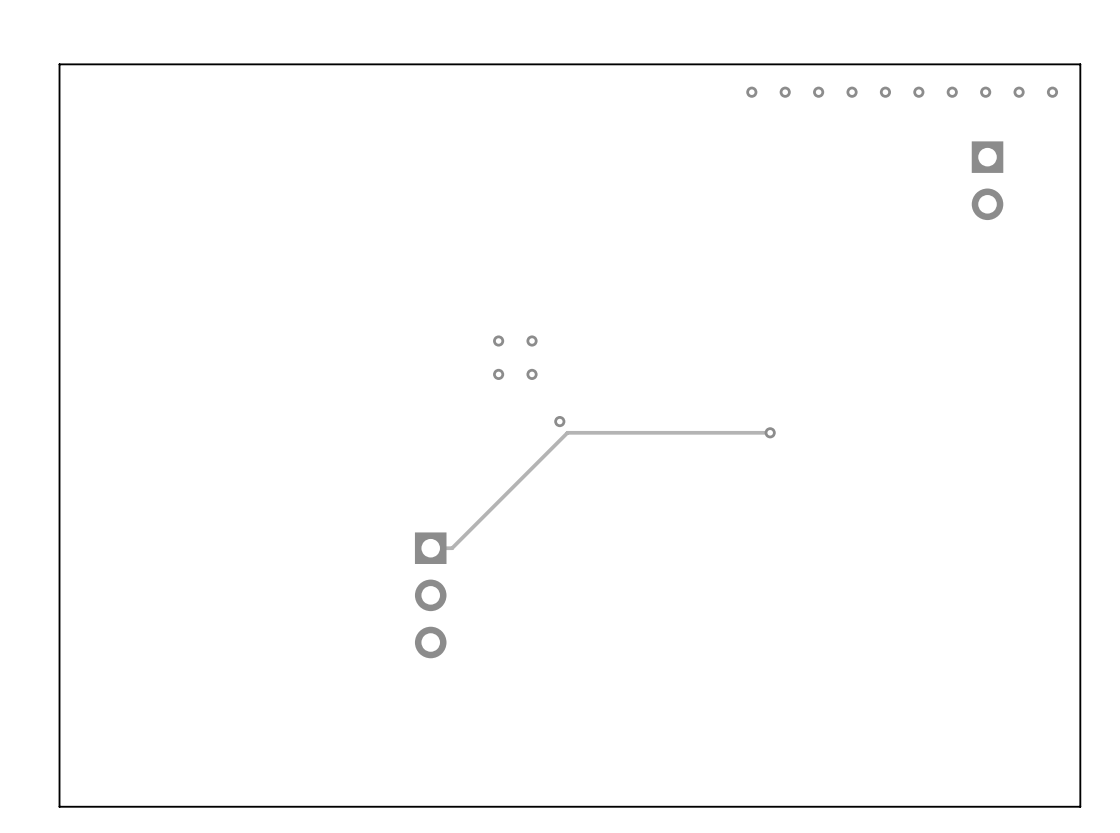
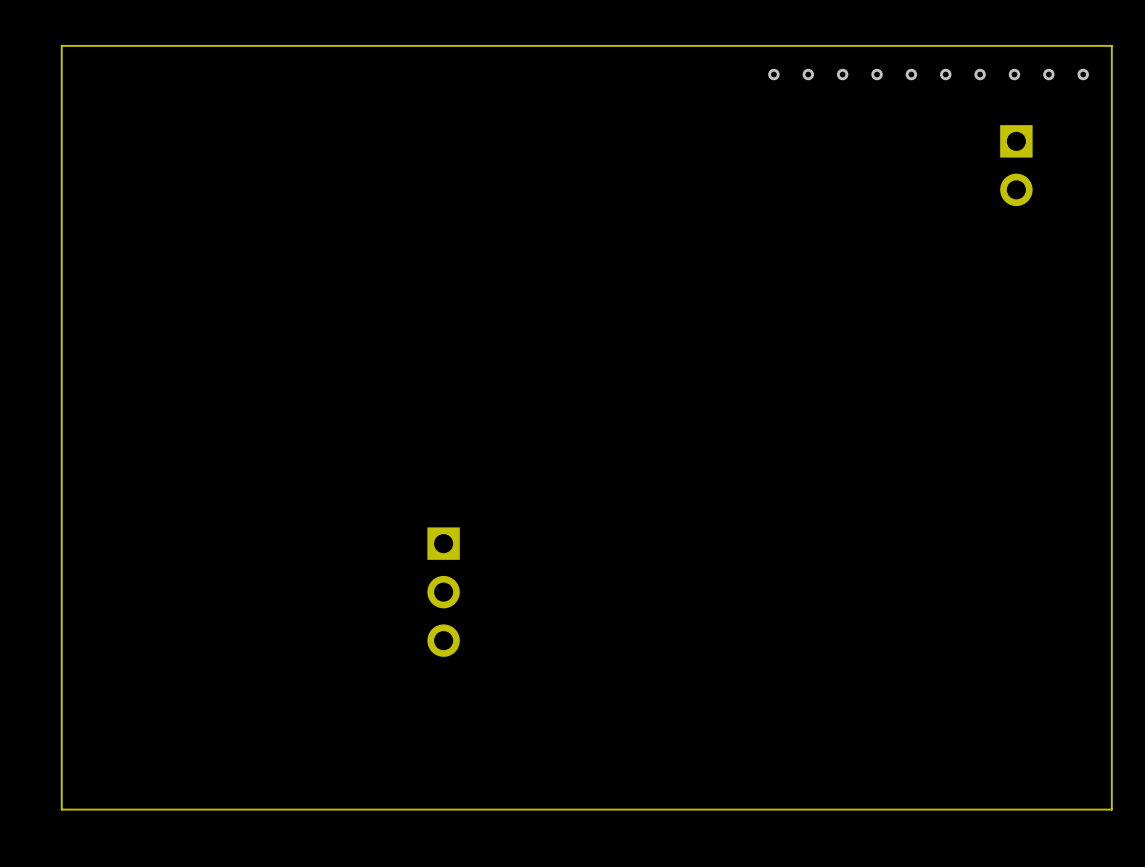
via: (498, 341) -> none
via: (532, 341) -> none
via: (498, 374) -> none
via: (532, 374) -> none
via: (559, 421) -> none
track: (770, 432) (567, 432) (452, 548) (430, 548) -> none
via: (770, 432) -> none

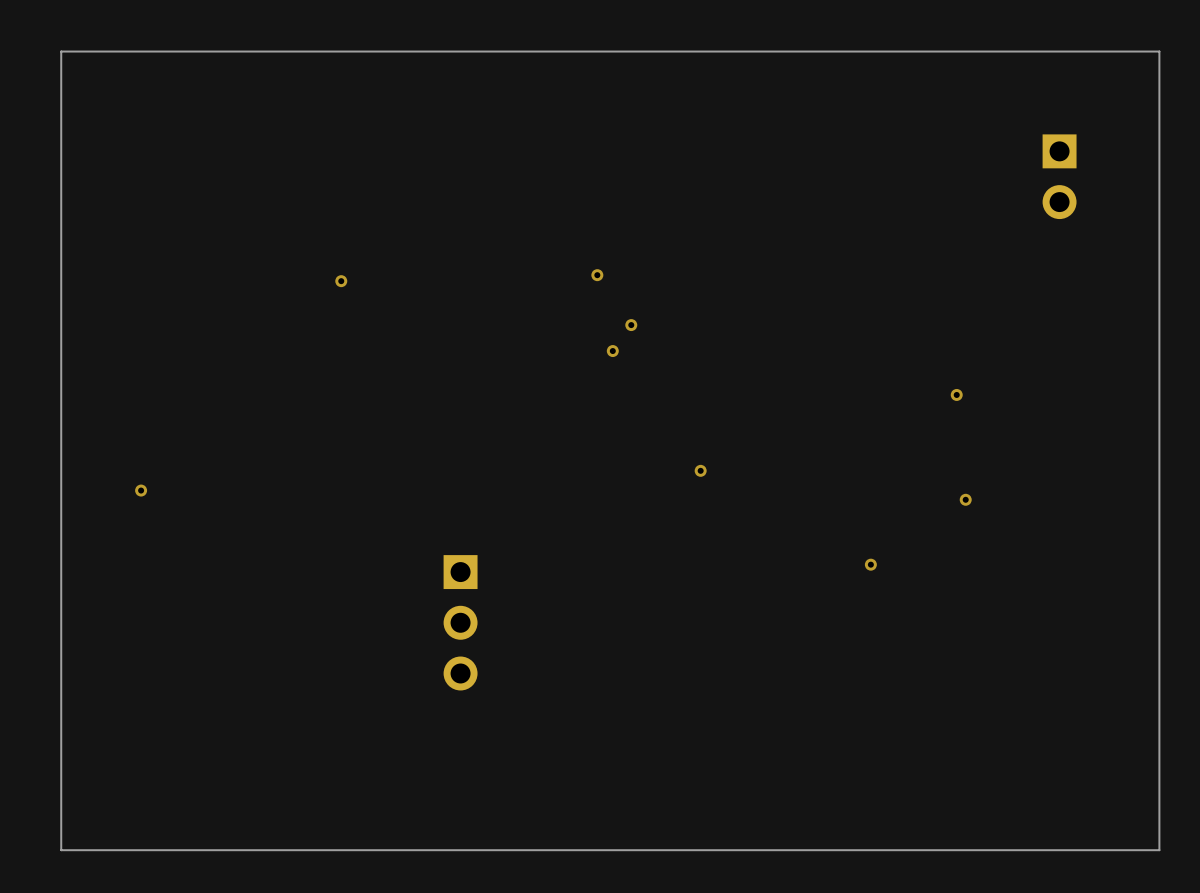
via: (773, 74) -> none
via: (808, 74) -> none
via: (842, 74) -> none
via: (877, 74) -> none
via: (911, 74) -> none
via: (945, 74) -> none
via: (980, 74) -> none
via: (1014, 74) -> none
via: (1048, 74) -> none
via: (1083, 74) -> none
via: none -> (597, 275)
via: none -> (341, 281)
via: none -> (631, 325)
via: none -> (612, 351)
via: none -> (956, 394)
via: none -> (700, 470)
via: none -> (141, 490)
via: none -> (965, 499)
via: none -> (870, 564)

